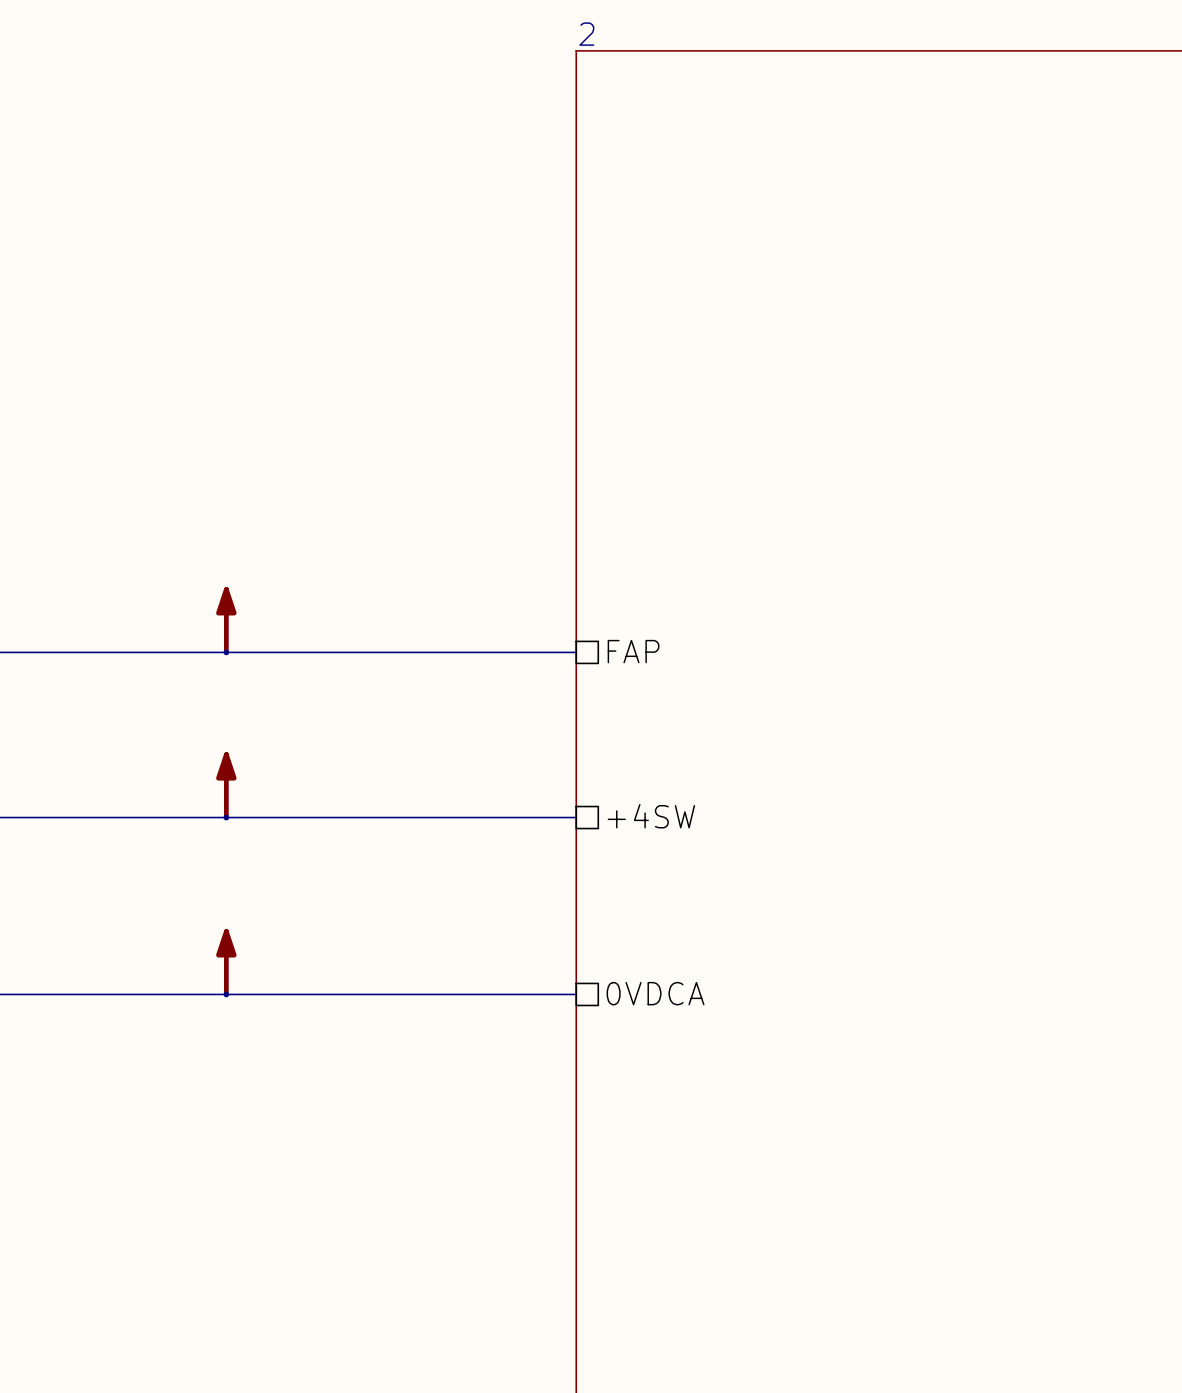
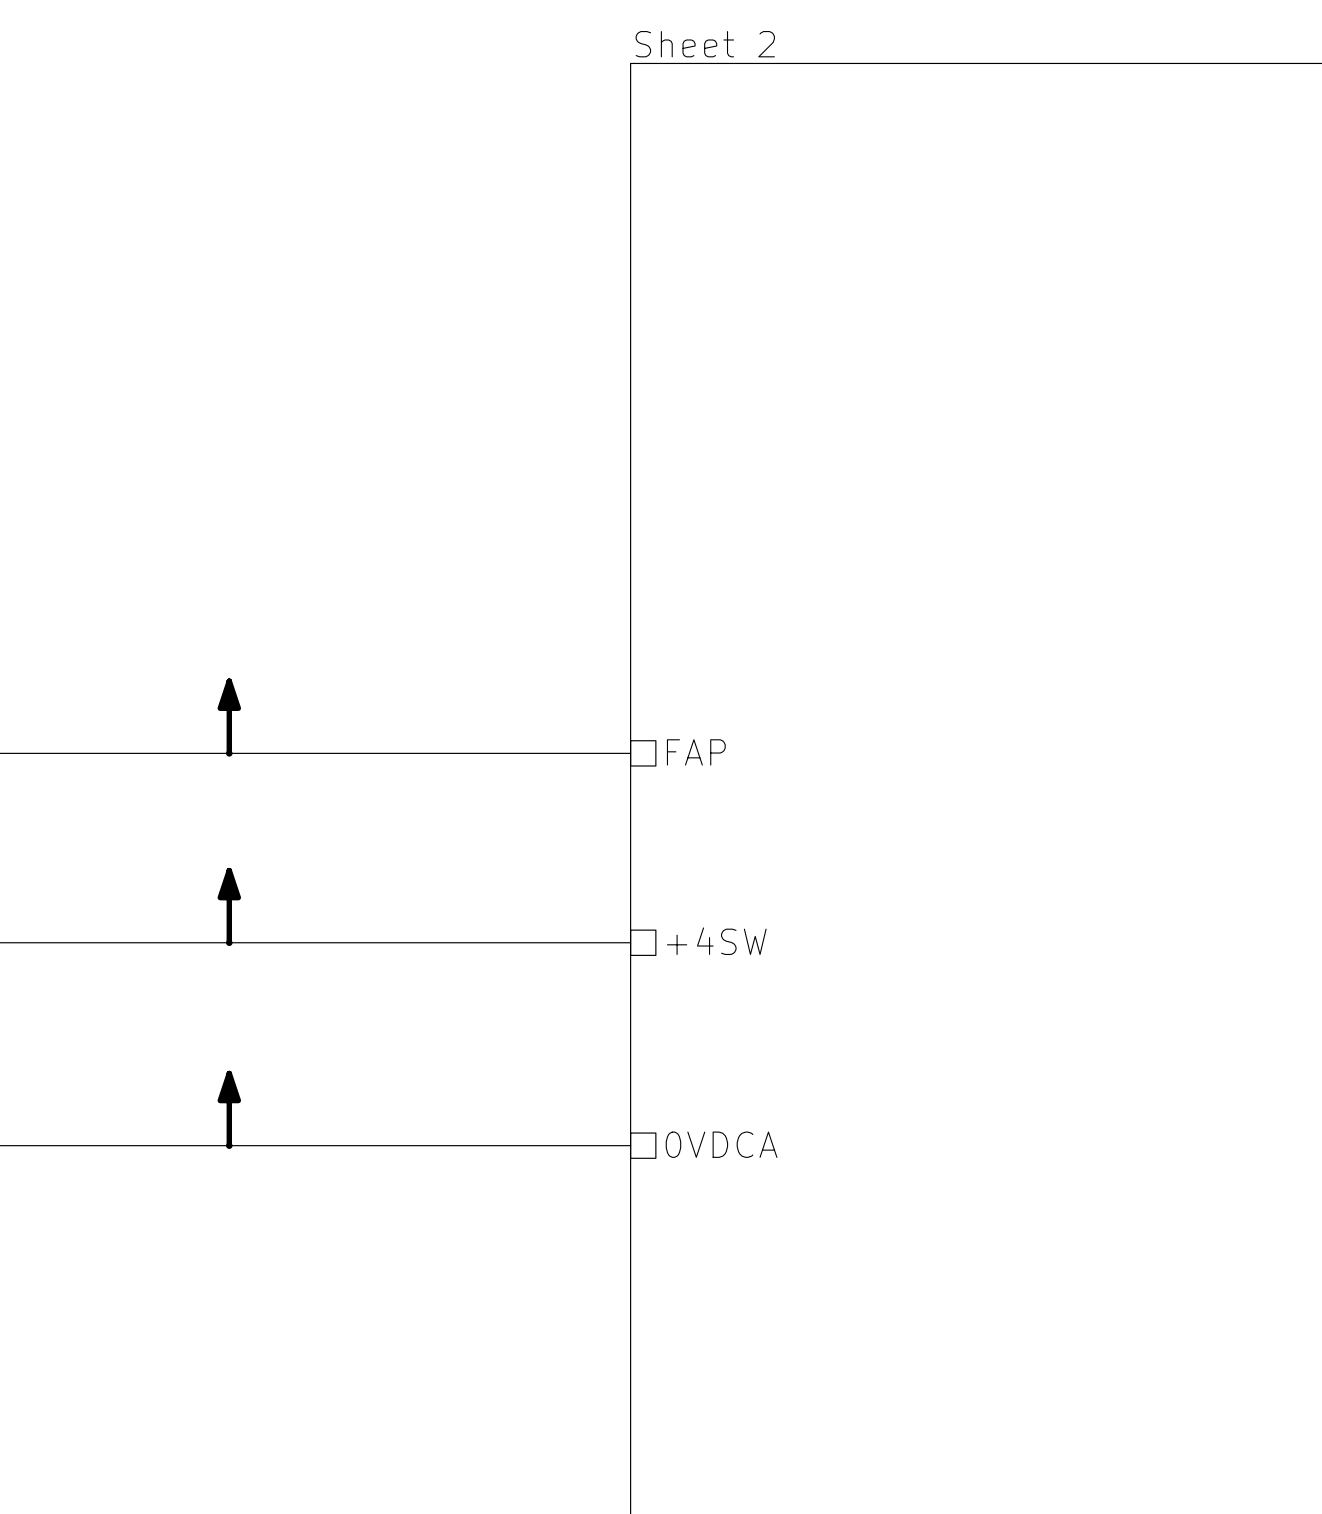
sheet 2 name: 2 (586, 34) -> Sheet 2 (705, 44)

